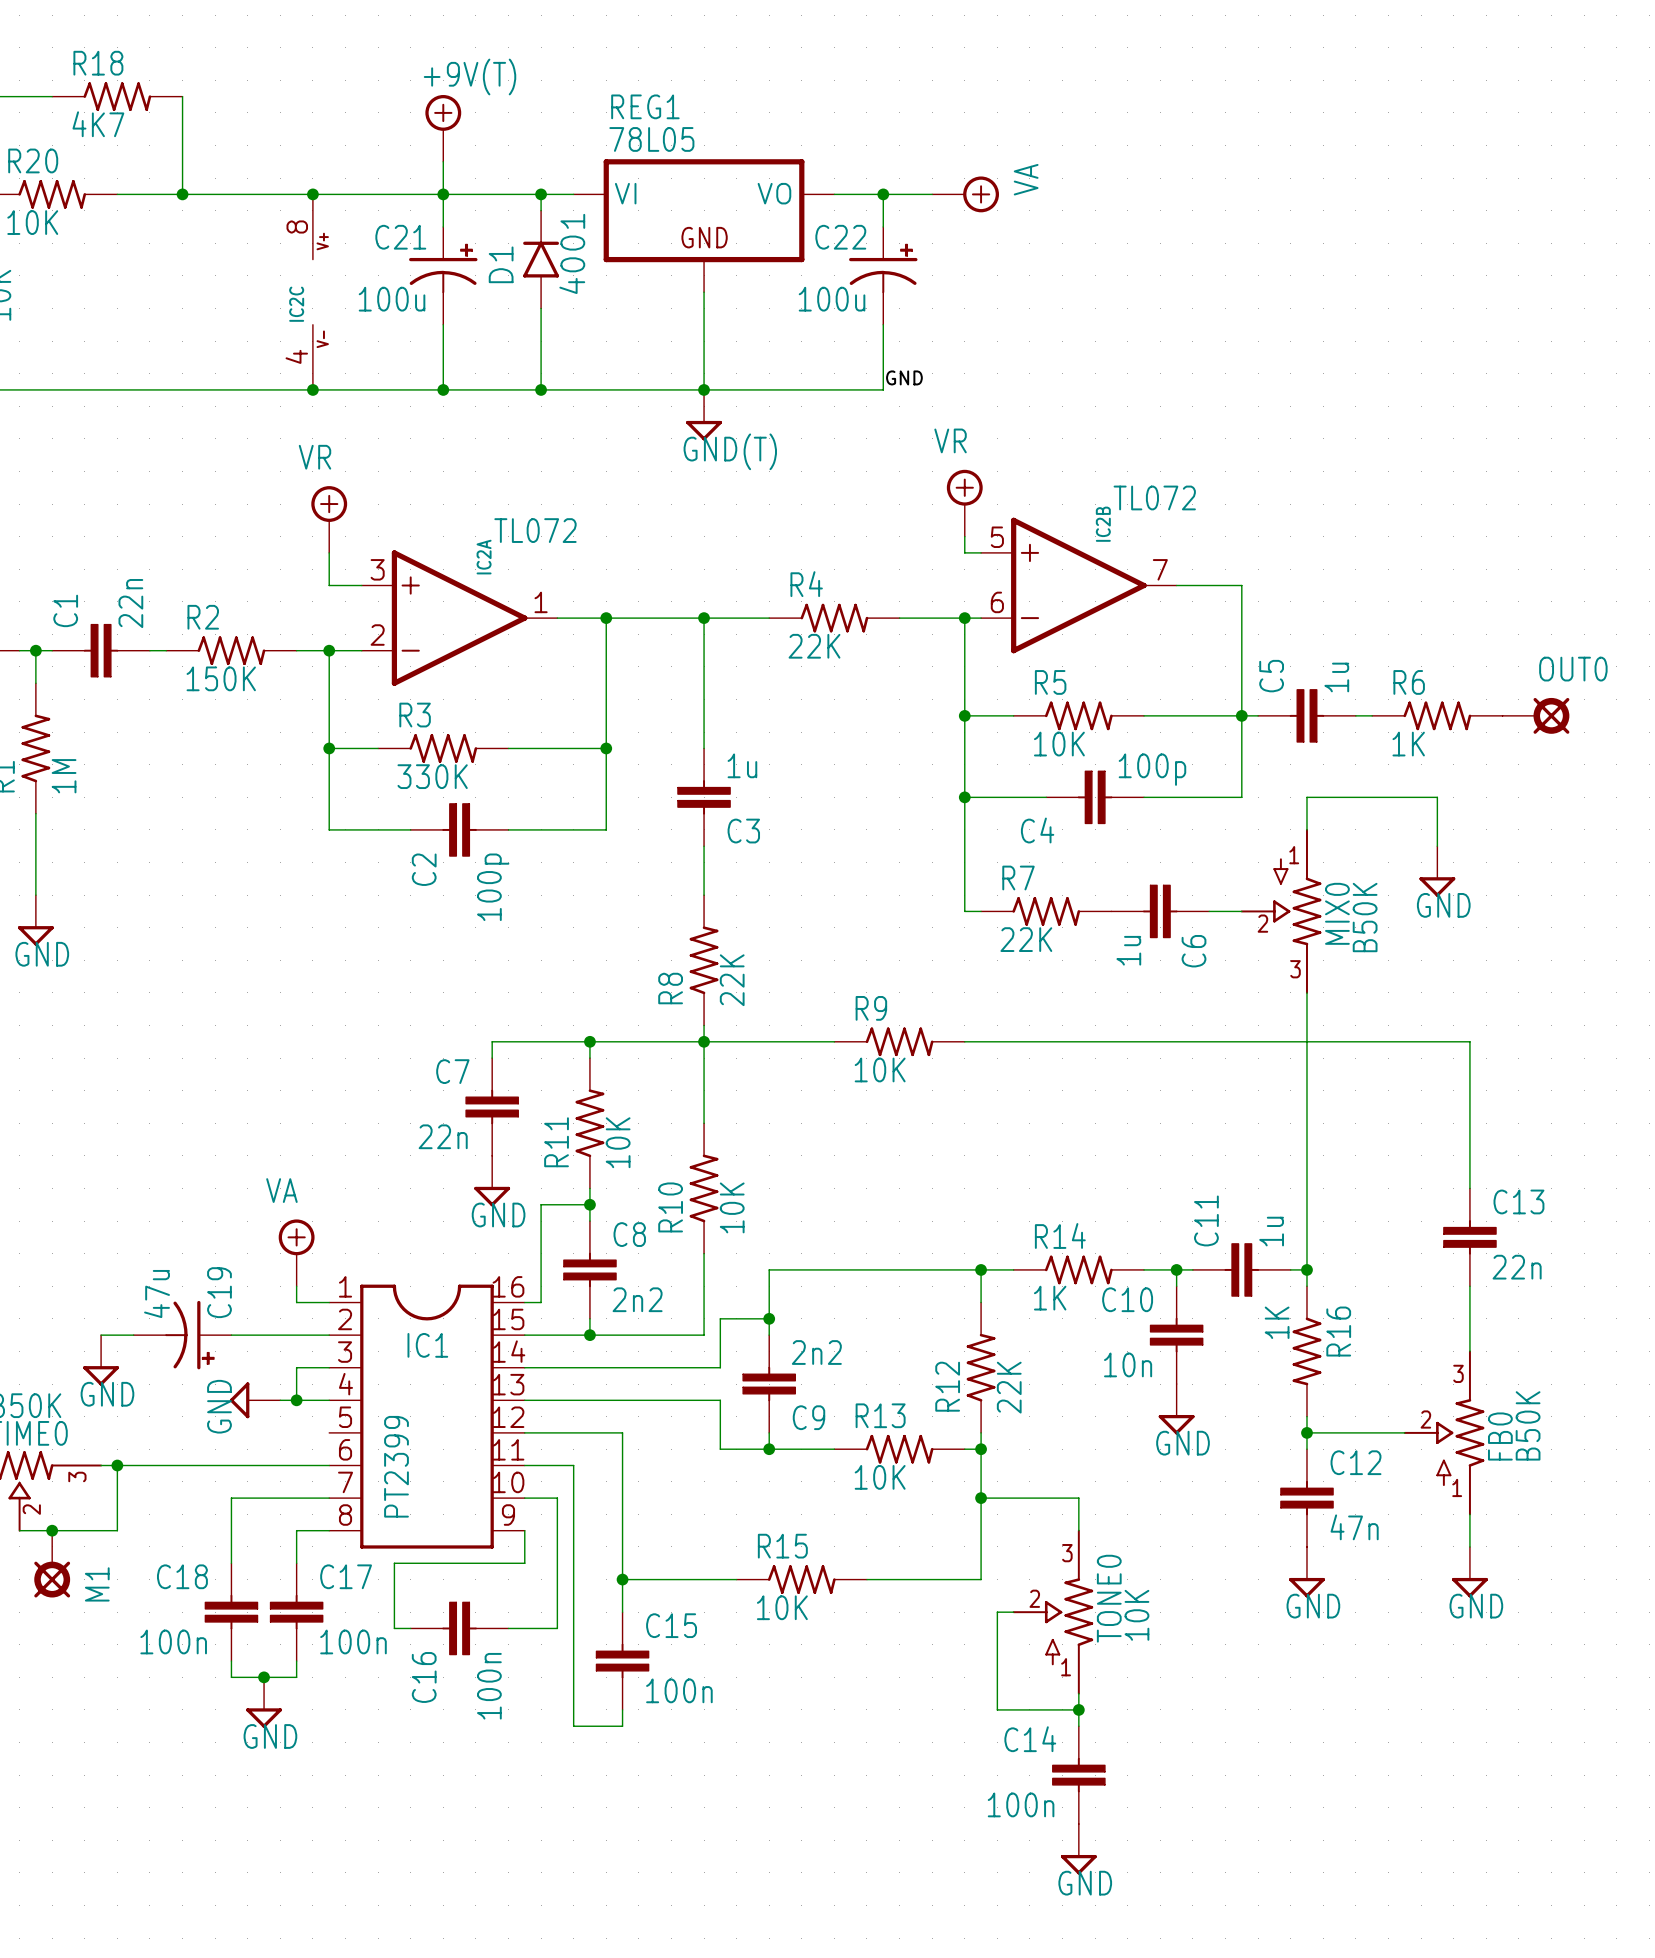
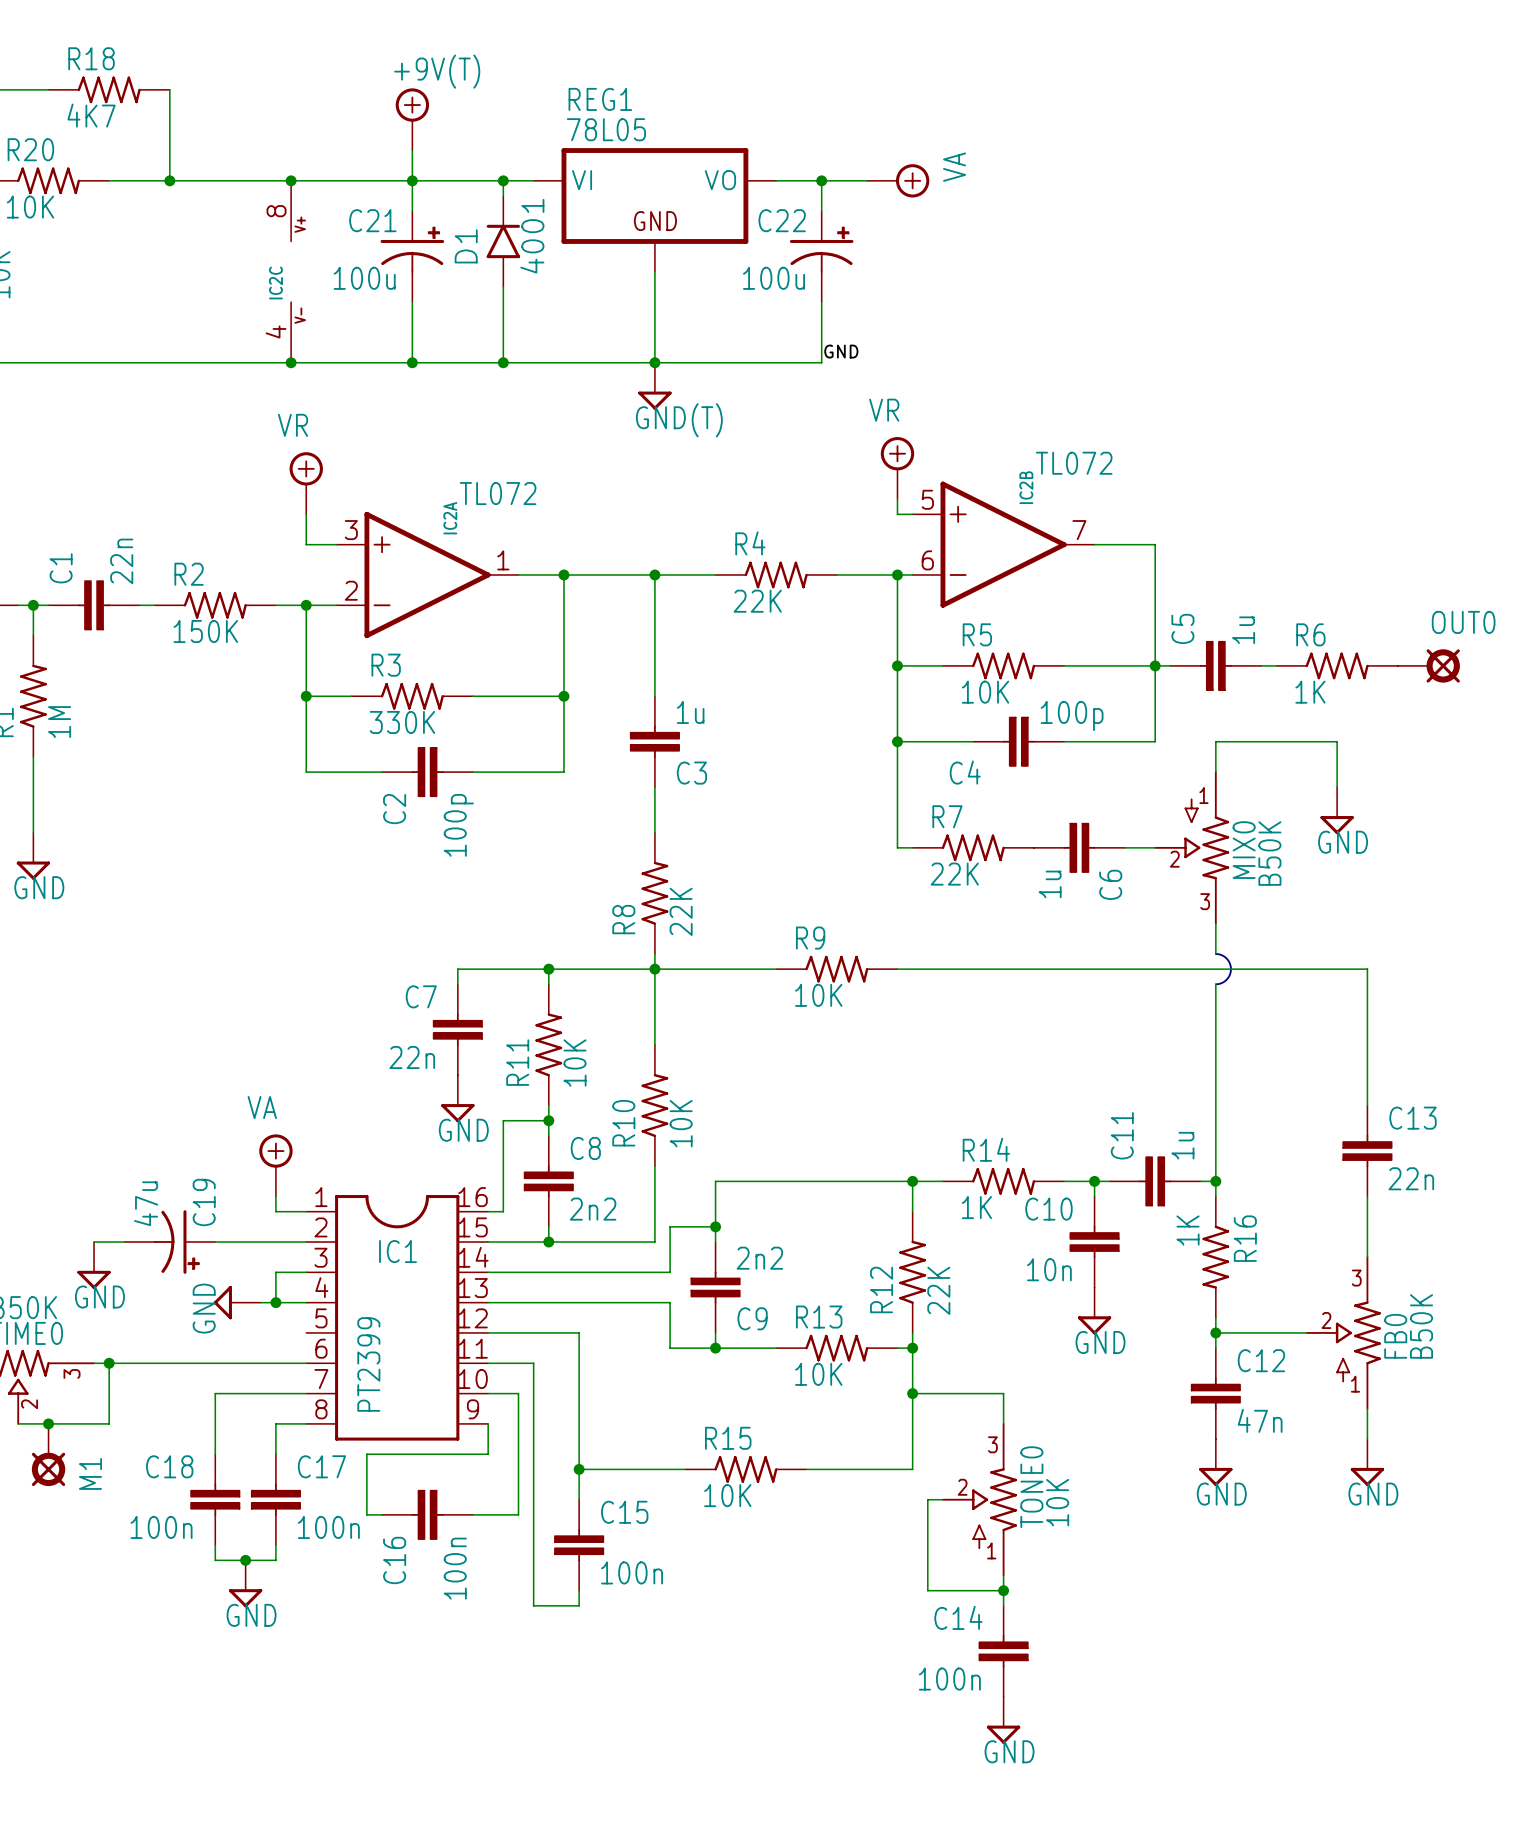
wire: (1306, 1025) (1306, 1058) -> none
line: none -> (1215, 953) (1226, 958) (1230, 969) (1226, 979) (1215, 984)

